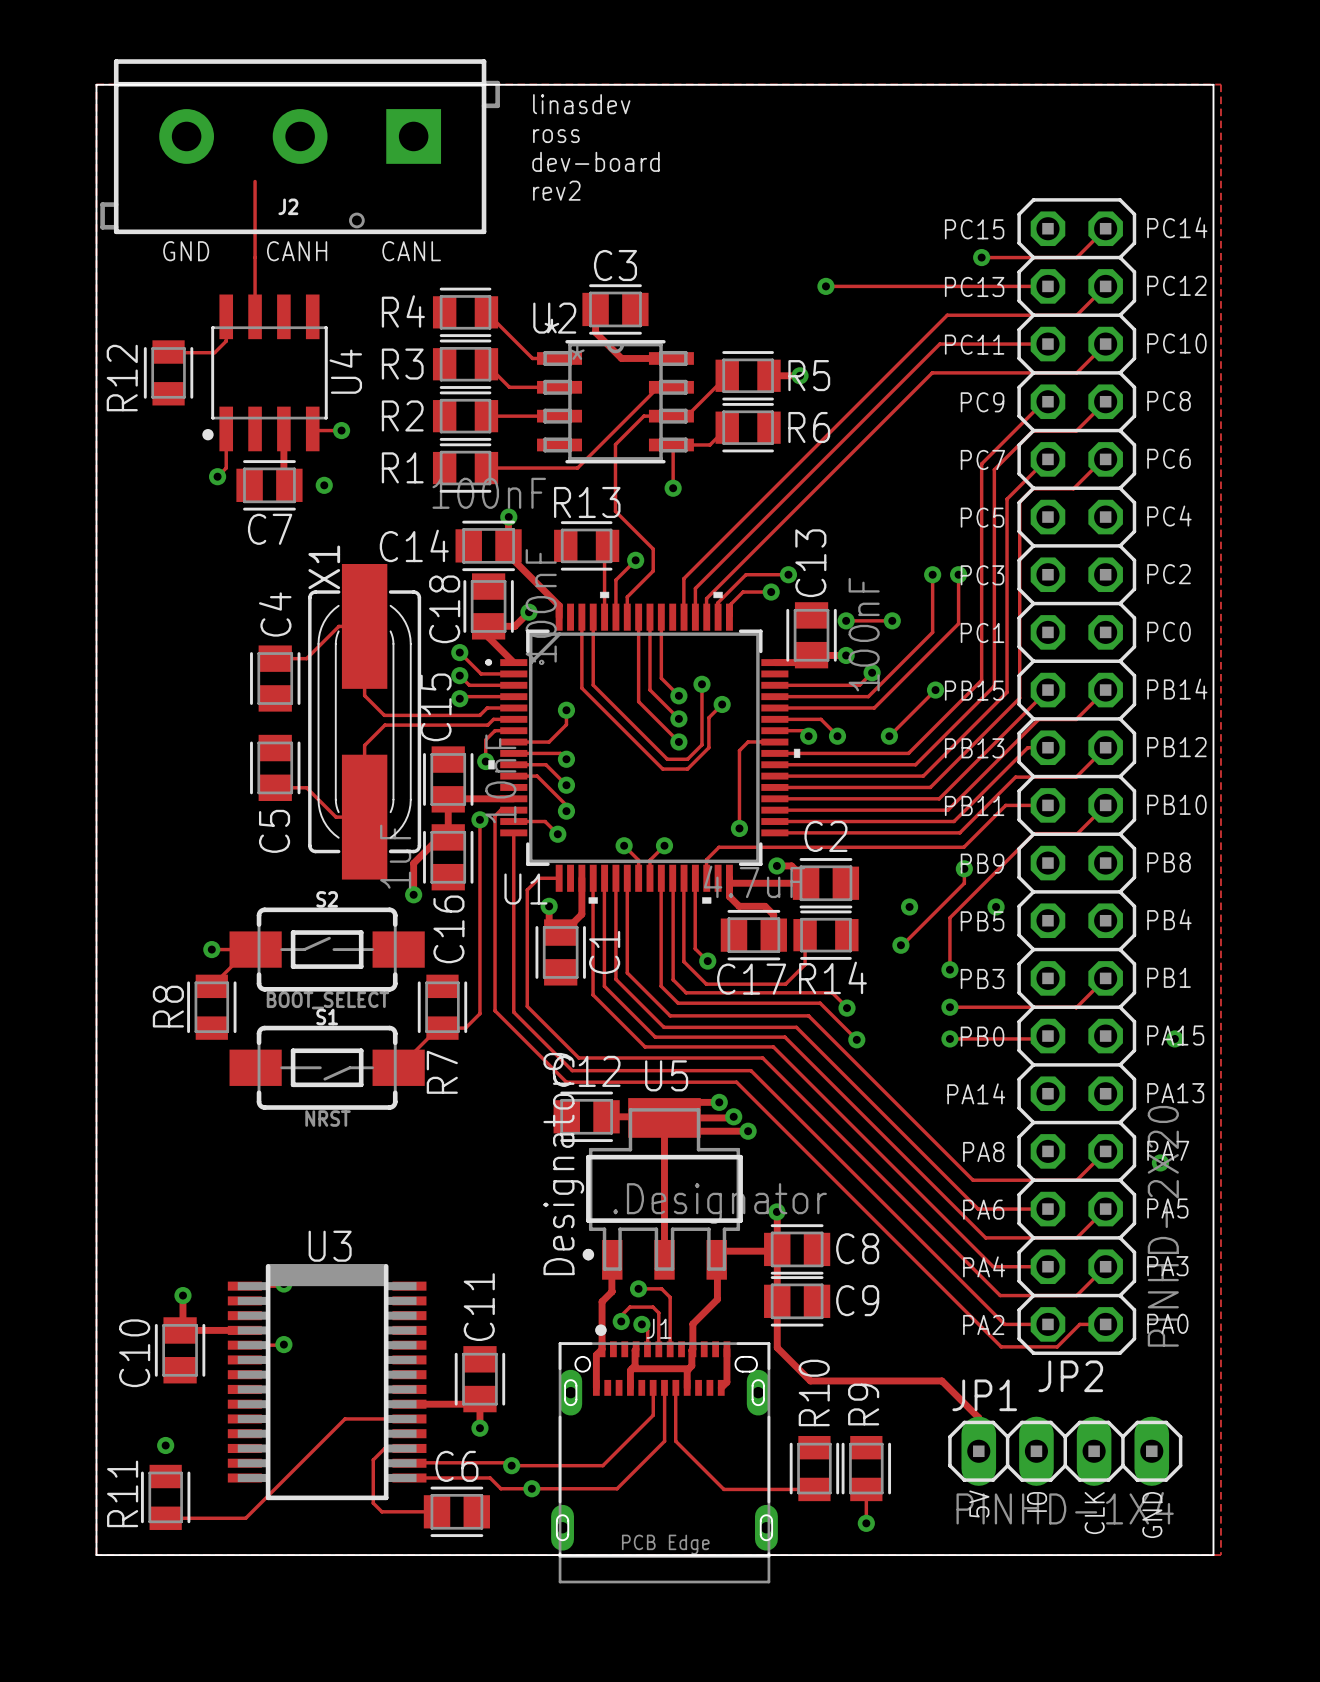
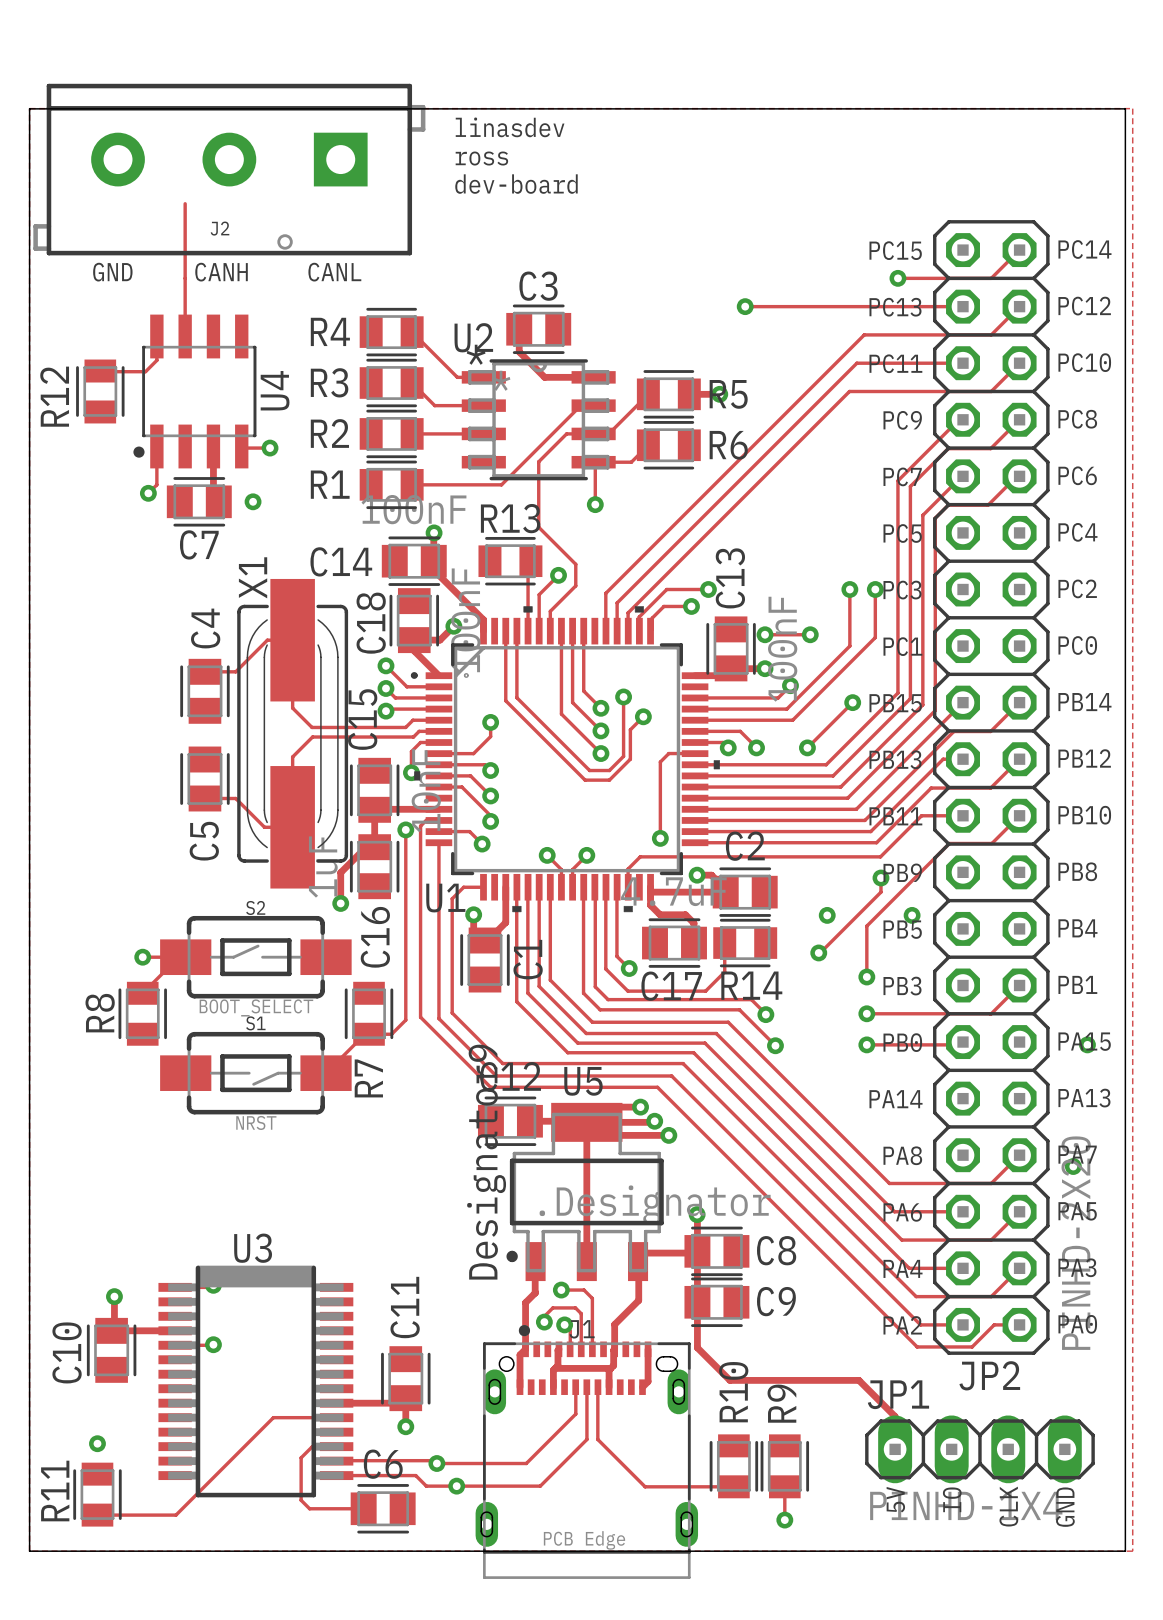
text: rev2 (556, 190) -> none

